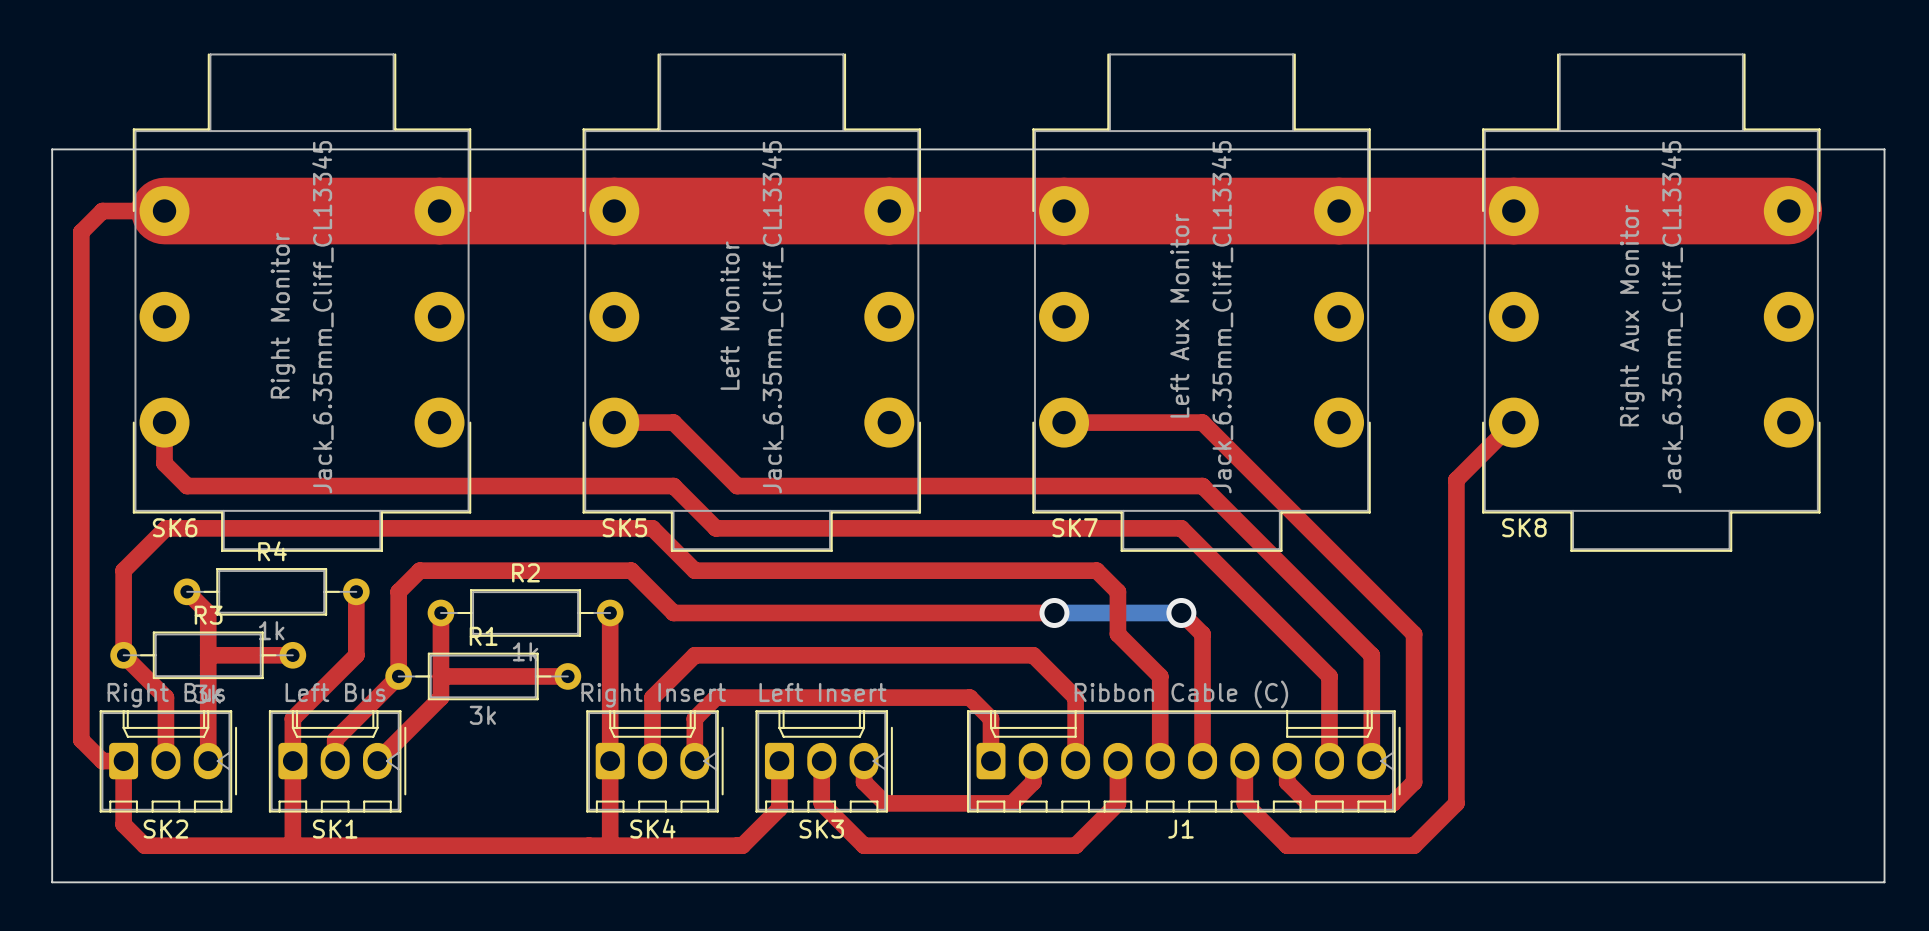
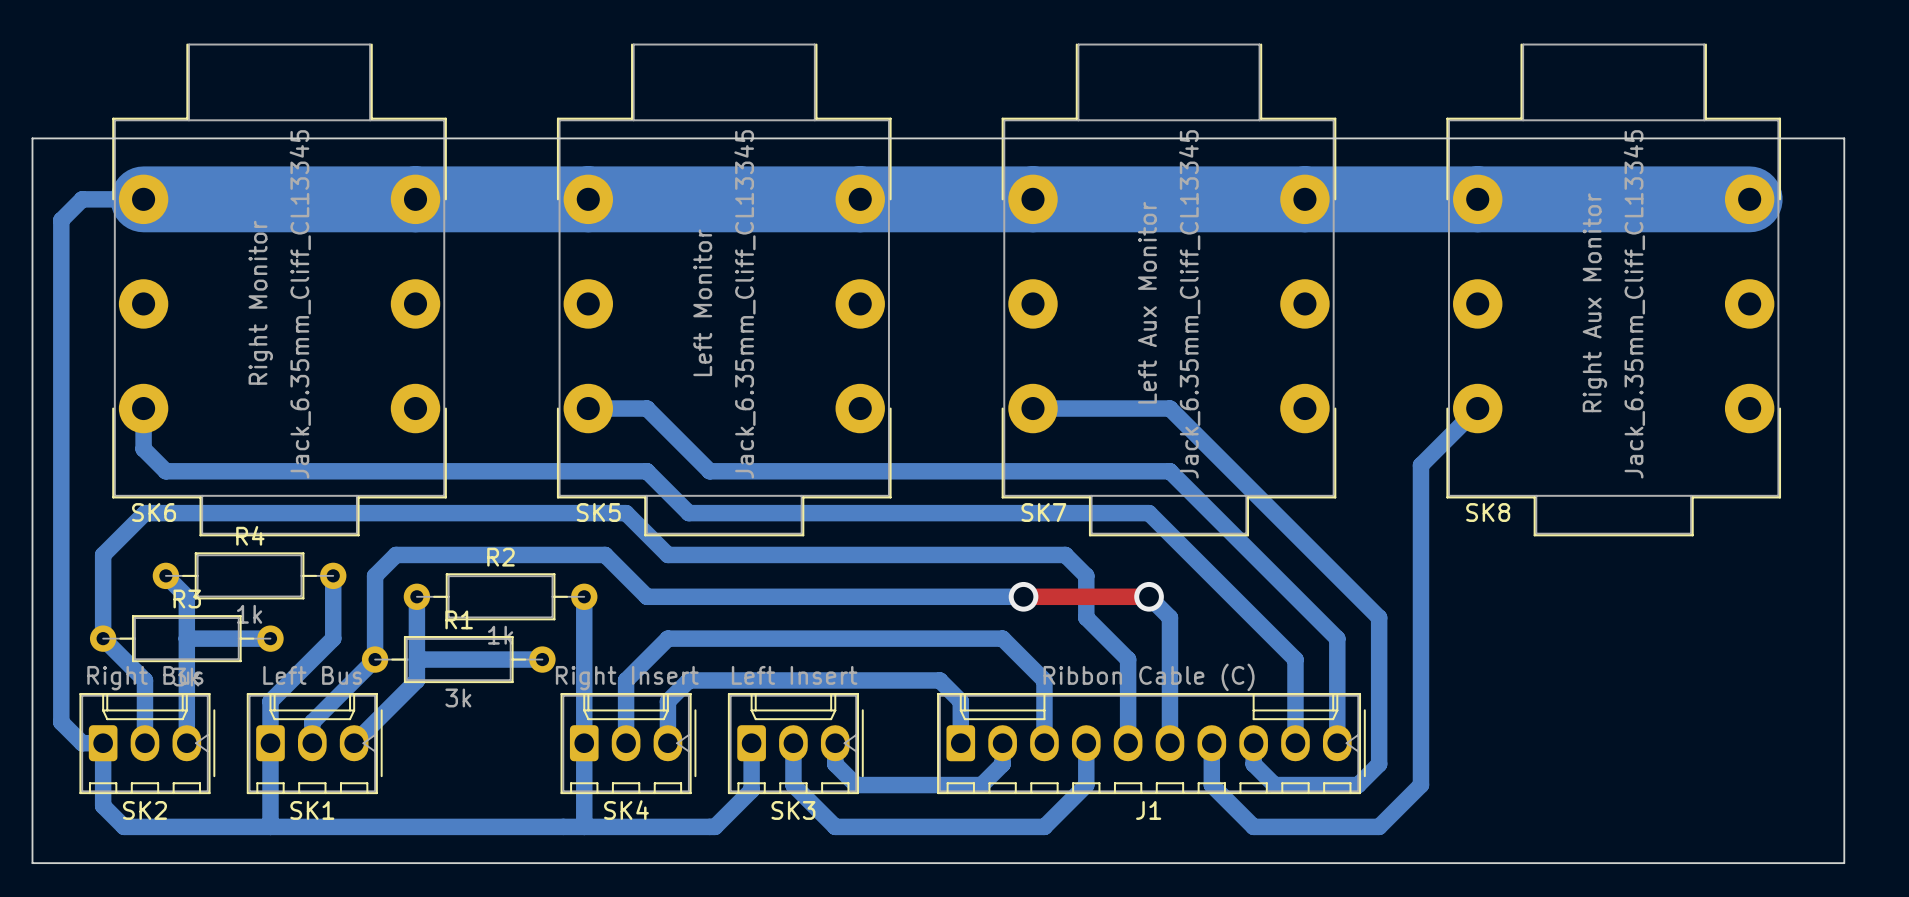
top track: (1788, 211) (102, 211) (81, 232) (81, 739) (102, 761) (123, 761) (123, 824) (144, 845) (742, 845) (779, 808) (779, 761) -> none
bottom track: none -> (1749, 199) (82, 199) (61, 220) (61, 722) (82, 743) (103, 743) (103, 805) (124, 826) (715, 826) (751, 790) (751, 743)
top track: (164, 422) (164, 463) (187, 486) (673, 486) (715, 528) (1181, 528) (1329, 676) (1329, 761) -> none
bottom track: none -> (143, 408) (143, 448) (165, 471) (647, 471) (688, 513) (1149, 513) (1295, 659) (1295, 743)
top track: (614, 422) (673, 422) (737, 486) (1202, 486) (1371, 655) (1371, 761) -> none
bottom track: none -> (588, 408) (647, 408) (709, 471) (1169, 471) (1337, 638) (1337, 743)
top track: (1064, 422) (1202, 422) (1414, 634) (1414, 782) (1392, 803) (1308, 803) (1287, 782) (1287, 761) -> none
bottom track: none -> (1033, 408) (1169, 408) (1379, 617) (1379, 764) (1358, 785) (1274, 785) (1253, 764) (1253, 743)
top track: (1513, 422) (1456, 479) (1456, 803) (1414, 845) (1287, 845) (1244, 803) (1244, 761) -> none
bottom track: none -> (1477, 408) (1420, 465) (1420, 785) (1379, 826) (1253, 826) (1211, 785) (1211, 743)
top track: (187, 591) (208, 612) (208, 761) -> none
bottom track: none -> (165, 575) (186, 596) (186, 743)
top track: (356, 591) (356, 655) (292, 718) (292, 845) -> none
bottom track: none -> (333, 575) (333, 638) (270, 701) (270, 826)
top track: (440, 612) (440, 697) (377, 761) -> none
bottom track: none -> (416, 596) (416, 680) (354, 743)
top track: (610, 612) (610, 845) -> none
bottom track: none -> (584, 596) (584, 826)
top track: (1054, 612) (673, 612) (631, 570) (419, 570) (398, 591) (398, 676) (335, 739) (335, 761) -> none
bottom track: (1054, 612) (1181, 612) -> (1169, 743) (1169, 617) (1149, 596)
bottom track: none -> (1023, 596) (647, 596) (605, 554) (396, 554) (375, 575) (375, 659) (312, 722) (312, 743)
top track: (1181, 612) (1202, 634) (1202, 761) -> (1149, 596) (1023, 596)
top track: (208, 655) (292, 655) -> none
bottom track: none -> (186, 638) (270, 638)
top track: (440, 676) (567, 676) -> none
bottom track: none -> (416, 659) (542, 659)
top track: (165, 761) (165, 697) (123, 655) (123, 570) (165, 528) (652, 528) (694, 570) (1096, 570) (1117, 591) (1117, 634) (1160, 676) (1160, 761) -> none
bottom track: none -> (144, 743) (144, 680) (103, 638) (103, 554) (144, 513) (626, 513) (667, 554) (1065, 554) (1086, 575) (1086, 617) (1128, 659) (1128, 743)
top track: (652, 761) (652, 697) (694, 655) (1033, 655) (1075, 697) (1075, 761) -> none
bottom track: none -> (626, 743) (626, 680) (667, 638) (1002, 638) (1044, 680) (1044, 743)
top track: (694, 761) (694, 718) (715, 697) (969, 697) (990, 718) (990, 761) -> none
bottom track: none -> (667, 743) (667, 701) (688, 680) (939, 680) (960, 701) (960, 743)
top track: (821, 761) (821, 803) (864, 845) (1075, 845) (1117, 803) (1117, 761) -> none
bottom track: none -> (793, 743) (793, 785) (835, 826) (1044, 826) (1086, 785) (1086, 743)
top track: (864, 761) (864, 782) (885, 803) (1012, 803) (1033, 782) (1033, 761) -> none
bottom track: none -> (835, 743) (835, 764) (856, 785) (981, 785) (1002, 764) (1002, 743)

